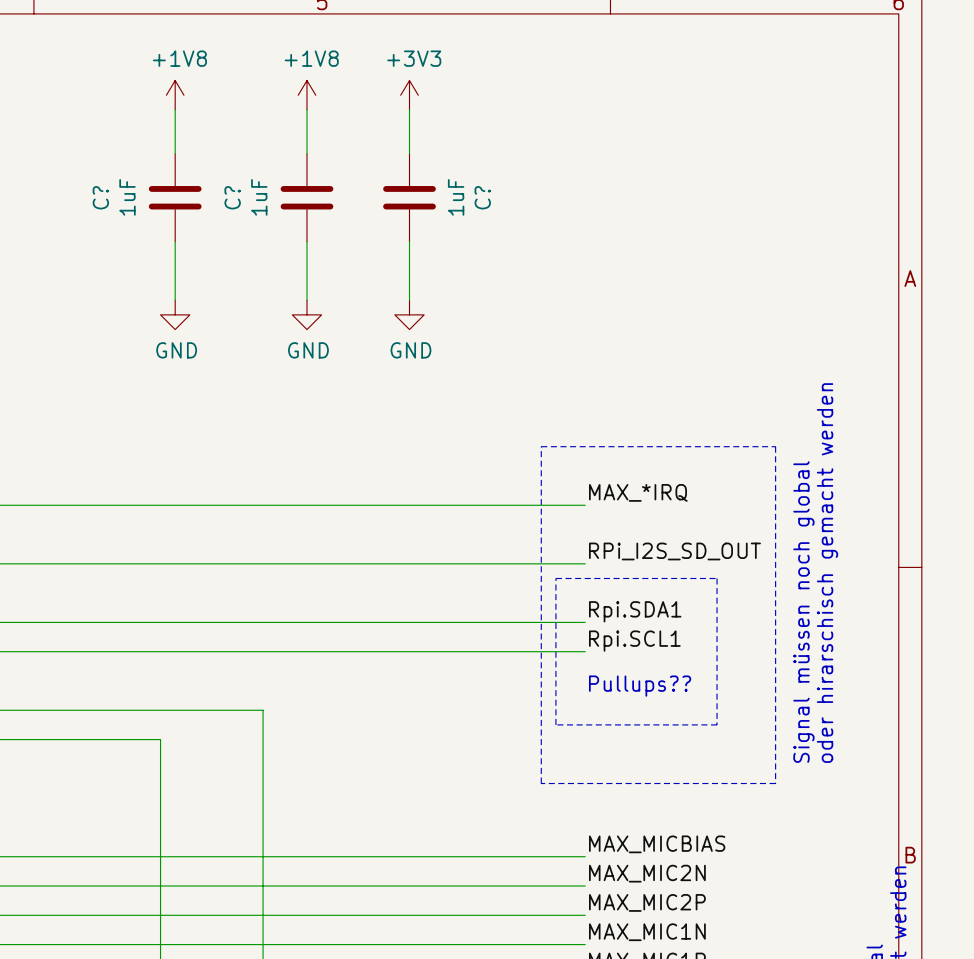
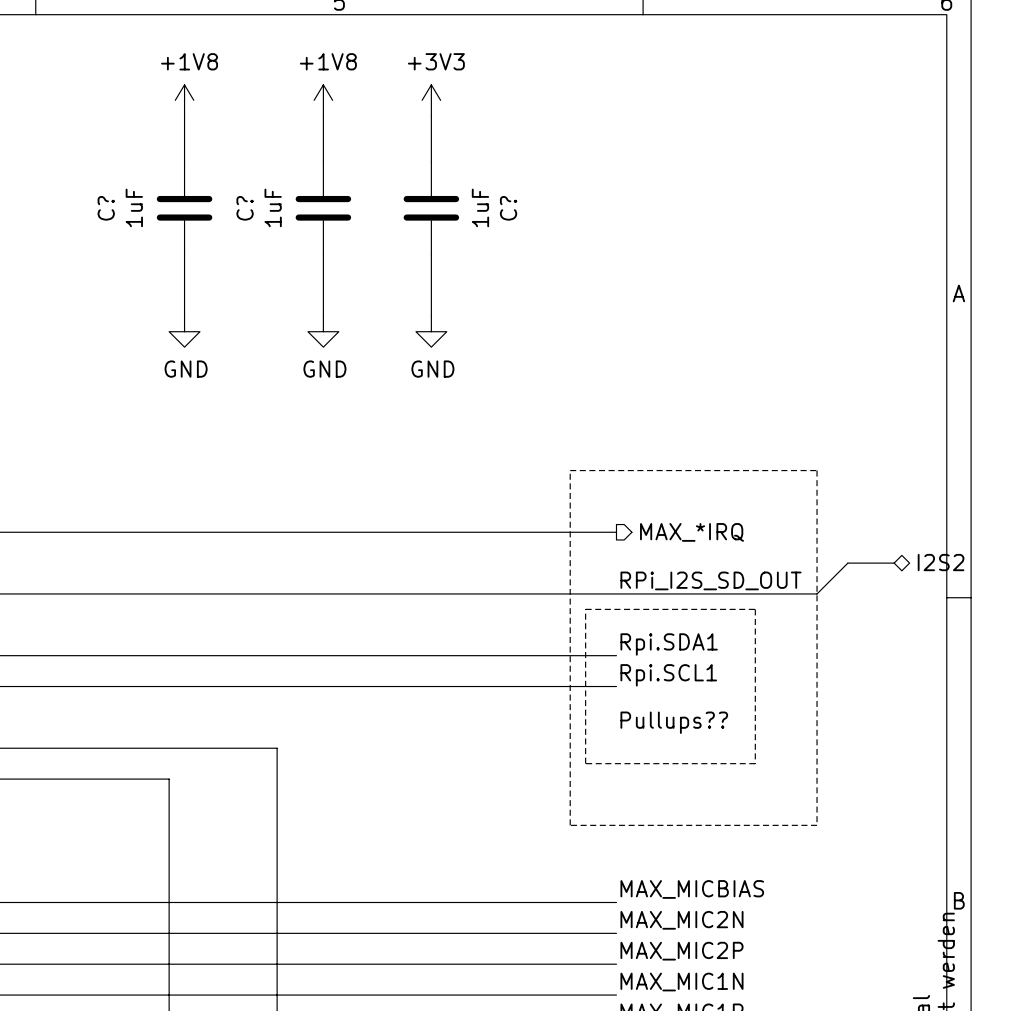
label: MAX_*IRQ (638, 492) -> none
hierarchical label: none -> MAX_*IRQ (692, 532)
wire: none -> (847, 563) (817, 593) (616, 593)
bus: none -> (847, 563) (894, 563)
hierarchical label: none -> I2S2 (941, 562)
text: oder hirarschisch gemacht werden (827, 573) -> none
text: Signal müssen noch global (803, 612) -> none

